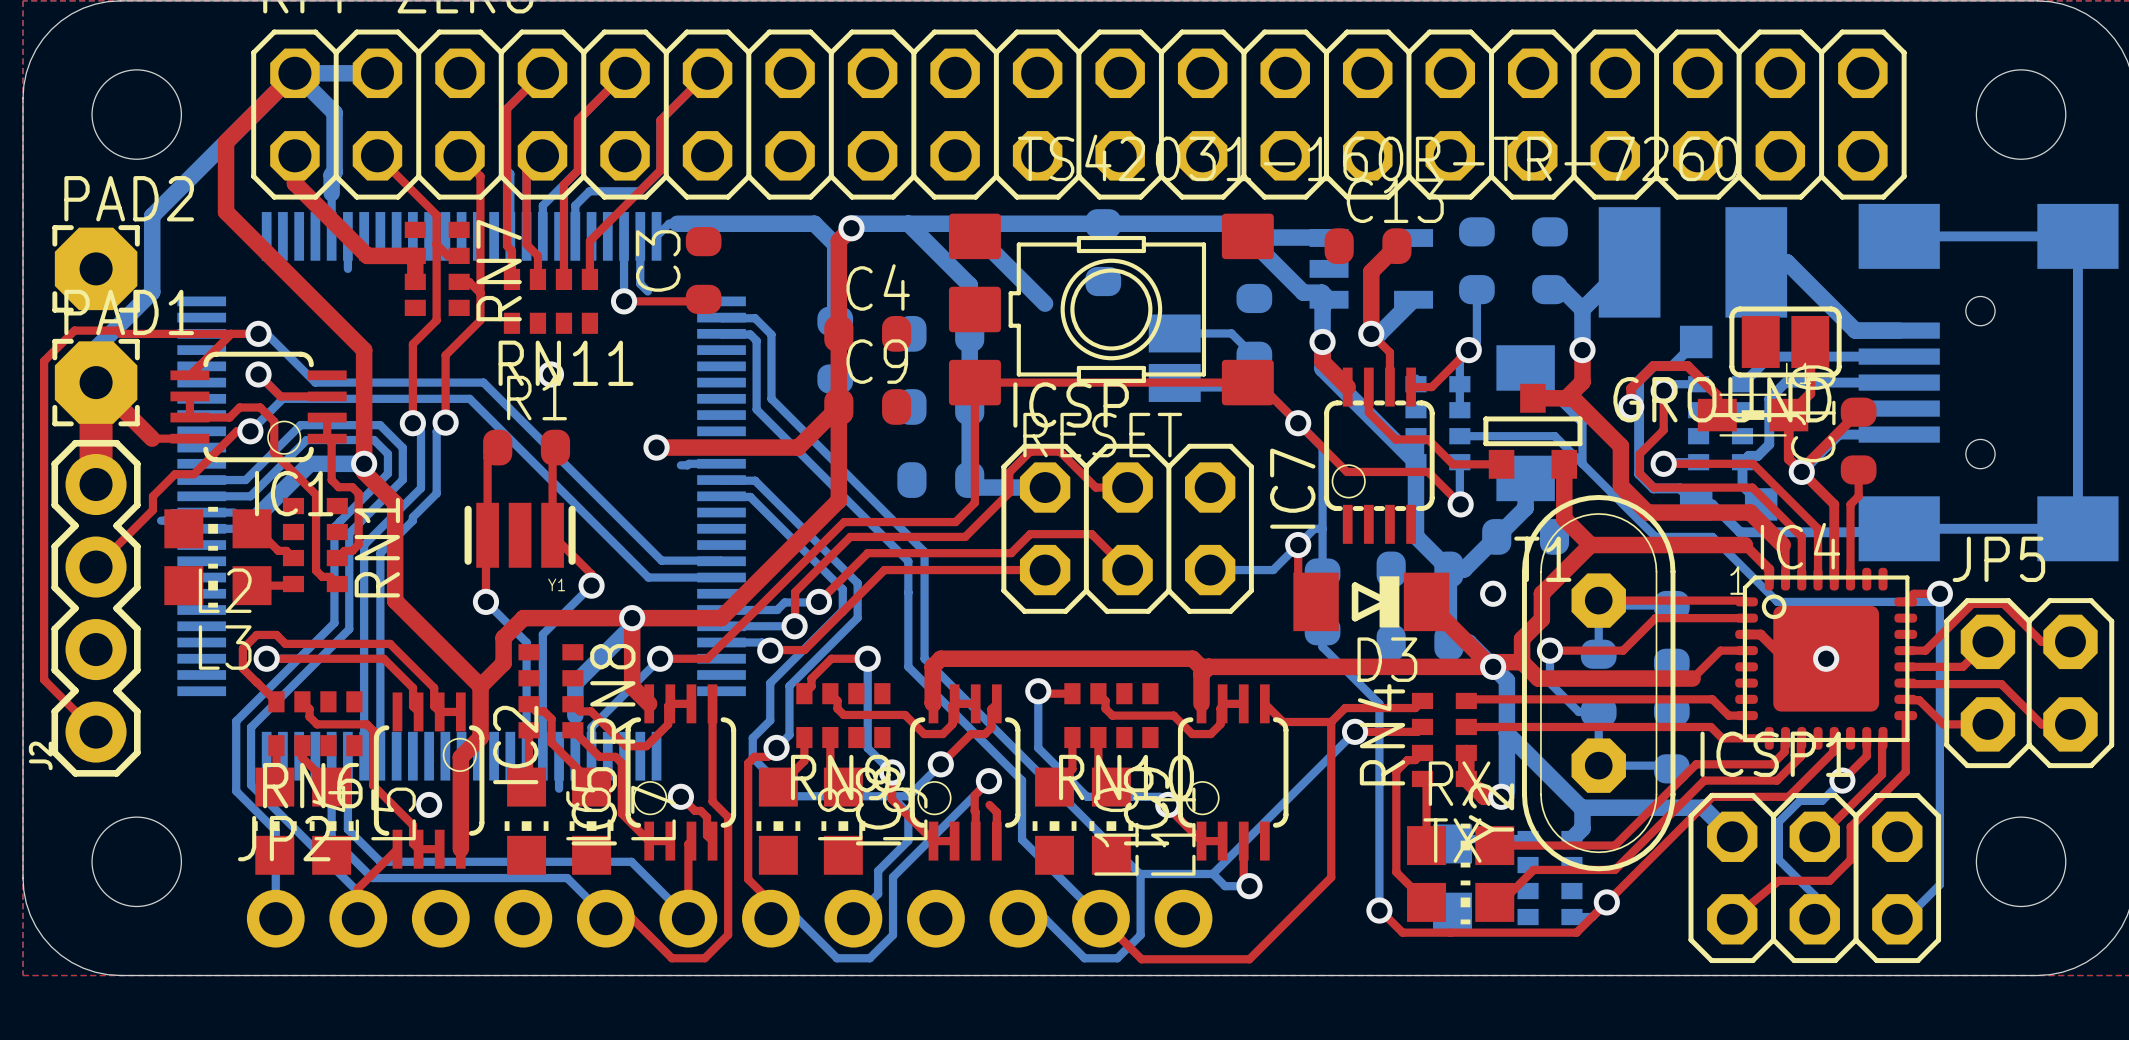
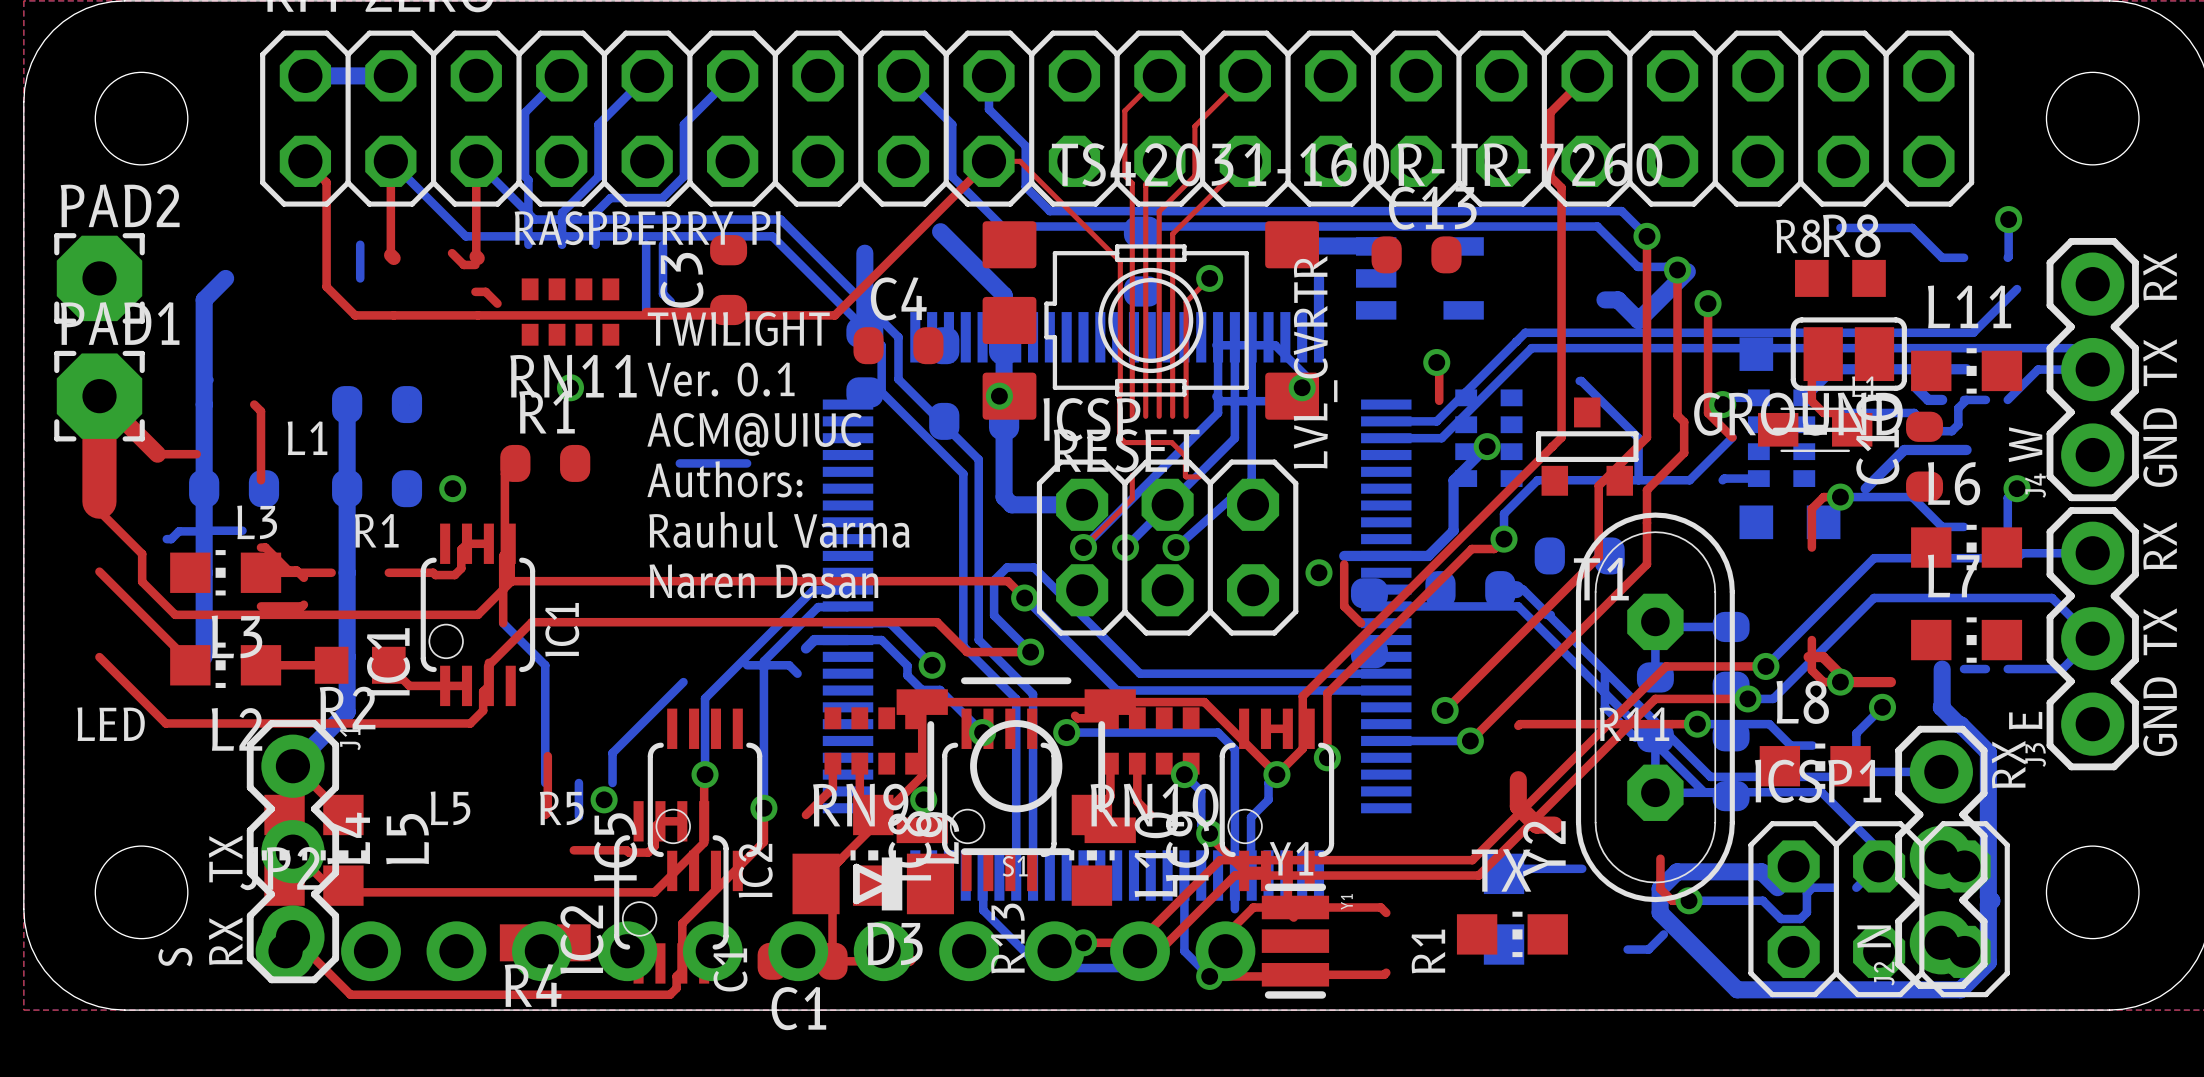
top track: (294, 73) (226, 142) (226, 212) (364, 350) (364, 472) (395, 503) (395, 600) (480, 686) -> none
top track: (542, 73) (507, 108) (507, 245) (511, 250) (511, 279) -> none
top track: (625, 73) (583, 114) -> none
top track: (707, 73) (660, 120) (660, 170) (589, 241) (589, 279) -> none
bottom track: none -> (903, 75) (952, 124) (952, 176) (1002, 226) (1597, 226) (1637, 266) (1666, 266) (1677, 270)
bottom track: none -> (988, 75) (988, 109) (1025, 146) (1025, 186) (1049, 211) (1621, 211) (1646, 236)
top track: none -> (1159, 75) (1124, 110) (1124, 175) (1132, 183) (1132, 416)
top track: none -> (1245, 75) (1194, 126) (1194, 175) (1159, 211) (1159, 416)
top track: none -> (1587, 75) (1550, 112) (1550, 176) (1561, 187) (1561, 437) (1302, 696) (1302, 748) (1276, 774) (1204, 702) (922, 702) (922, 776) (816, 883) (832, 900) (832, 961) (910, 961) (911, 959)
top track: (583, 114) (577, 120) (577, 170) (563, 184) (563, 279) -> none
top track: (294, 155) (294, 183) (367, 255) (415, 255) (415, 281) -> (305, 161) (326, 182) (326, 286) (355, 315) (834, 315) (988, 161) (1020, 161) (1120, 261) (1119, 437) (1125, 442) (1171, 442) (1185, 456) (1185, 476) (1199, 476)
top track: (377, 155) (436, 214) (436, 320) (412, 344) (412, 423) -> (390, 161) (390, 255) (393, 258)
bottom track: none -> (390, 161) (465, 236) (772, 236) (881, 345) (881, 392) (963, 473) (963, 646) (1016, 699) (1016, 875)
top track: (459, 155) (480, 176) (480, 320) (445, 355) (445, 422) -> (476, 161) (476, 256) (477, 258)
bottom track: none -> (476, 161) (534, 219) (780, 219) (898, 337) (898, 379) (978, 459) (978, 639) (1033, 694) (1033, 875)
top track: (542, 155) (526, 171) (526, 244) (537, 255) (537, 279) -> none
top track: none -> (1245, 161) (1172, 234) (1172, 416)
top track: none -> (1145, 183) (1145, 416)
bottom track: none -> (2008, 219) (2007, 257)
via: none -> (2008, 219)
text: none -> RASPBERRY PI (647, 228)
bottom track: none -> (1840, 227) (1912, 227) (1942, 257) (1964, 257)
bottom track: (965, 223) (1045, 303) -> none
top track: (851, 228) (838, 240) (838, 500) (721, 618) (523, 618) (503, 637) (503, 663) (480, 686) -> none
via: (851, 228) -> none
top track: none -> (1646, 236) (1646, 437) (1598, 485) (1598, 556) (1445, 710)
via: none -> (1646, 236)
text: none -> R8 (1798, 236)
bottom track: (331, 236) (334, 112) (294, 73) (152, 216) (152, 292) (96, 348) (96, 382) -> none
bottom track: (656, 236) (669, 223) (814, 223) (835, 244) (855, 223) (1234, 223) (1303, 292) (1321, 292) (1329, 299) (1322, 306) (1322, 368) (1415, 462) -> none
bottom track: (1899, 236) (2077, 236) (2077, 528) (1899, 528) (1854, 532) (1740, 532) (1712, 504) (1696, 504) (1680, 488) (1653, 488) (1639, 474) (1639, 414) (1631, 406) (1639, 399) (1639, 380) (1653, 366) (1672, 366) (1696, 341) -> none
top track: (1396, 246) (1371, 271) (1371, 333) (1387, 350) -> none
part: (1476, 260) -> none
part: (1549, 260) -> none
top track: none -> (1677, 270) (1677, 415) (1684, 422) (1684, 452) (1646, 490) (1646, 564)
via: none -> (1677, 270)
text: none -> RX (2160, 276)
part: (1692, 262) -> none
bottom track: (1756, 262) (1787, 262) (1855, 330) (1899, 330) -> none
bottom track: none -> (225, 278) (204, 299) (204, 656)
RN7: (437, 268) -> none
top track: none -> (1209, 278) (1186, 301) (1186, 416)
via: none -> (1209, 278)
bottom track: none -> (1318, 278) (1318, 337) (1318, 303)
R8: none -> (1840, 278)
bottom track: none -> (2017, 289) (1973, 332) (1525, 332) (1436, 421) (1386, 421)
bottom track: (1476, 289) (1476, 341) (1459, 359) (1459, 410) -> none
top track: none -> (1708, 303) (1708, 413) (1732, 437)
via: none -> (1708, 303)
bottom track: (1413, 299) (1379, 333) (1371, 333) -> none
via: (624, 301) -> none
bottom track: (1582, 309) (1582, 350) -> none
bottom track: (721, 317) (755, 318) (771, 334) (771, 398) (924, 551) (924, 658) (1140, 874) (1140, 935) (1117, 958) (1084, 958) (1044, 918) (1018, 918) -> none
text: none -> TWILIGHT (738, 329)
bottom track: none -> (1218, 337) (1218, 412) (1083, 547)
bottom track: none -> (1234, 337) (1234, 438) (1125, 547)
bottom track: none -> (1251, 337) (1251, 480) (1176, 547)
C1 side: bottom (1254, 327) -> top (802, 961)
top track: (231, 333) (189, 375) -> none
top track: (258, 333) (120, 333) (117, 330) (74, 330) (44, 361) (44, 679) (96, 732) -> none
bottom track: (258, 333) (266, 333) (315, 382) (483, 382) (661, 560) (721, 561) -> none
via: (258, 333) -> none
bottom track: (721, 333) (750, 334) (756, 340) (756, 409) (908, 561) (908, 666) -> (805, 648) (814, 640) (881, 640) (907, 665) (907, 675) (921, 689) (940, 690)
via position: (1371, 333) -> (1436, 362)
text: none -> LVL_CVRTR (1315, 362)
top track: (1322, 341) (1322, 361) (1347, 387) -> none
via: (1322, 341) -> none
top track: (1810, 341) (1810, 393) (1788, 415) (1788, 458) (1834, 504) (1834, 579) -> none
text: none -> TX (2160, 362)
top track: (1468, 350) (1431, 387) (1411, 387) -> none
via: (1468, 350) -> none
top track: (1582, 350) (1582, 382) (1566, 398) -> none
via: (1582, 350) -> none
J4: none -> (2092, 369)
part: (1174, 358) -> none
top track: none -> (1811, 370) (1811, 401) (1823, 412) (1840, 412)
text: none -> Ver. 0.1 (721, 379)
top track: (258, 374) (280, 396) (327, 396) -> none
via: (258, 374) -> none
via: none -> (1302, 387)
bottom track: none -> (1916, 387) (1928, 399) (1942, 399)
via: none -> (999, 396)
bottom track: (1899, 382) (1785, 382) (1769, 398) (1769, 444) (1757, 455) (1748, 455) (1742, 462) (1742, 485) (1761, 504) -> none
part: (1988, 382) -> none
bottom track: none -> (1964, 399) (1985, 399)
bottom track: none -> (1966, 399) (1958, 408) (1958, 424) (1951, 431) (1932, 431) (1914, 412) (1840, 412)
bottom track: none -> (2007, 399) (2038, 369) (2092, 369) (2071, 348) (1531, 348) (1441, 438) (1386, 438)
bottom track: (1262, 387) (1322, 447) (1322, 573) -> none
top track: (1368, 387) (1368, 412) (1395, 439) (1428, 439) (1453, 464) (1501, 464) -> none
top track: none -> (254, 404) (260, 411) (260, 480)
bottom track: none -> (347, 404) (347, 712) (292, 766)
part: none -> (377, 404)
top track: (1663, 390) (1663, 430) (1639, 453) (1639, 473) (1653, 487) (1752, 487) (1801, 536) (1801, 579) -> none
top track: (189, 396) (189, 417) (229, 417) (239, 407) (260, 407) (274, 421) (274, 452) (316, 494) (316, 570) (322, 576) (330, 576) (337, 584) -> none
bottom track: (282, 398) (469, 398) (648, 577) (721, 577) -> none
bottom track: (282, 398) (250, 431) -> none
top track: (1532, 398) (1573, 398) (1620, 446) (1620, 486) (1647, 512) (1750, 512) (1785, 547) (1785, 579) -> none
IC1 rotation: 0° (258, 406) -> 90° clockwise (477, 614)
IC1 position: (258, 406) -> (477, 614)
top track: (838, 406) (798, 447) (656, 447) -> none
C9: (867, 406) -> none
top track: (1631, 406) (1631, 388) (1653, 366) (1687, 366) (1717, 395) (1717, 415) -> none
via: (1631, 406) -> none
top track: (1858, 412) (1801, 469) (1801, 471) -> none
top track: (327, 417) (327, 438) (331, 443) (331, 480) (338, 487) (352, 487) (358, 493) (358, 544) (352, 550) (344, 550) (337, 558) -> none
text: none -> ACM@UIUC (754, 434)
bottom track: (445, 422) (436, 431) (436, 493) (380, 553) (380, 756) -> none
via: (445, 422) -> none
bottom track: none -> (1732, 437) (1689, 480) (1537, 480) (1504, 513) (1504, 539)
text: none -> L1 (307, 438)
bottom track: (412, 423) (421, 431) (421, 488) (364, 545) (364, 756) -> none
via: (412, 423) -> none
via: (1298, 423) -> none
part: (1525, 423) -> none
text: none -> GND (2160, 447)
text: none -> W (2025, 444)
top track: (250, 431) (236, 431) (193, 474) (175, 474) (152, 496) (152, 510) (96, 567) -> none
via: (250, 431) -> none
bottom track: none -> (1487, 446) (1453, 480) (1453, 530) (1428, 555) (1344, 555)
via: none -> (1487, 446)
bottom track: (1415, 436) (1415, 536) (1448, 569) (1448, 642) (1468, 642) (1506, 680) (1506, 791) (1501, 796) -> none
bottom track: (1459, 436) (1554, 436) (1655, 536) (1712, 536) (1777, 601) (1931, 601) (1939, 593) (1939, 884) (1905, 919) (1897, 919) -> none
J2 footprint: [51, 439, 141, 777] -> [1895, 725, 1988, 989]
top track: (555, 447) (552, 450) (552, 535) (591, 574) (591, 585) -> none
via: (656, 447) -> none
IC7: (1379, 455) -> none
top track: none -> (1132, 475) (1132, 498) (1083, 547)
bottom track: (1459, 462) (1460, 504) -> none
bottom track: (364, 463) (309, 463) (244, 528) (201, 528) -> none
via: (364, 463) -> none
text: none -> Authors: (724, 479)
bottom track: (721, 463) (680, 465) -> none
top track: (1663, 463) (1753, 463) (1818, 528) (1818, 579) -> none
via: (1663, 463) -> none
top track: (1564, 464) (1564, 518) (1590, 545) (1744, 545) (1769, 569) (1769, 579) -> none
top track: none -> (99, 486) (99, 511) (142, 553) (142, 581) (175, 614) (477, 614) (510, 582) (510, 543)
top track: (1858, 469) (1858, 496) (1850, 504) (1850, 579) -> none
part: none -> (234, 488)
part: none -> (377, 488)
via: none -> (452, 488)
via position: (1801, 471) -> (1840, 497)
bottom track: none -> (2017, 488) (2007, 497) (2007, 526)
via: none -> (2017, 488)
bottom track: (1525, 478) (1525, 508) (1464, 569) -> (1941, 771) (1870, 771) (1866, 776) (1710, 776) (1523, 589) (1516, 589)
bottom track: (201, 480) (245, 480) (300, 425) (380, 425) (402, 447) (402, 479) (349, 533) (349, 629) (251, 727) (251, 785) (358, 892) (358, 918) -> none
bottom track: (721, 480) (755, 480) (857, 583) (857, 617) (789, 686) (789, 735) (776, 747) -> none
part: (940, 480) -> none
top track: none -> (1840, 497) (1823, 497) (1811, 508) (1811, 547)
bottom track: none -> (1840, 497) (1912, 497) (1942, 526) (1964, 526)
top track: (1127, 487) (1095, 487) (1059, 451) (1030, 451) (1009, 472) (1009, 492) (965, 536) (850, 536) (795, 592) (794, 626) -> none
bottom track: (201, 496) (250, 496) (306, 440) (374, 440) (387, 453) (387, 473) (334, 527) (334, 623) (236, 721) (236, 791) (275, 830) (275, 918) -> none
part position: (461, 496) -> (1117, 606)
bottom track: (721, 496) (750, 496) (842, 589) (842, 611) (770, 683) (770, 720) (752, 738) (752, 757) (791, 796) (908, 796) (940, 764) -> none
text: none -> L3 (257, 522)
top track: (1460, 504) (1428, 471) (1346, 471) (1257, 382) (974, 382) (974, 502) (955, 522) (844, 522) (707, 658) (660, 658) -> none
via position: (1460, 504) -> (1504, 539)
text: none -> R1 (376, 530)
text: none -> Rauhul Varma (779, 529)
top track: none -> (1504, 539) (1494, 548) (1471, 548) (1327, 693) (1327, 757)
text: none -> RX (2160, 545)
top track: none -> (488, 543) (467, 543) (461, 549) (461, 568) (454, 575) (435, 575) (433, 572) (388, 572)
L2 position: (217, 528) -> (225, 665)
via: none -> (1083, 547)
via: none -> (1125, 547)
via: none -> (1176, 547)
bottom track: (1322, 528) (1314, 528) (1273, 570) (1210, 570) -> none
bottom track: none -> (2092, 553) (2022, 553) (2017, 558) (1874, 558) (1765, 666)
Y1 rotation: 0° (520, 535) -> 90° clockwise (1295, 941)
Y1 position: (520, 535) -> (1295, 941)
RN1: (315, 545) -> none
via position: (1298, 545) -> (1318, 572)
top track width: thick (1590, 545) (1541, 593) -> thin (1646, 564) (1596, 614)
top track: none -> (99, 571) (190, 662) (190, 665)
top track: none -> (260, 572) (331, 572)
top track: none -> (510, 581) (1007, 581) (1024, 598)
text: none -> Naren Dasan (763, 581)
bottom track: none -> (848, 589) (813, 590) (705, 698) (705, 774)
top track: (1045, 570) (884, 570) (804, 650) (770, 650) -> none
top track: (1127, 570) (1091, 534) (1030, 534) (1011, 553) (867, 553) (818, 601) -> none
bottom track: none -> (1024, 598) (1117, 690) (1386, 690)
via: none -> (1024, 598)
Y1 name position: Y1 (556, 584) -> Y1 (1346, 901)
L3 position: (217, 585) -> (225, 572)
bottom track: (591, 585) (542, 634) (542, 756) -> none
via: (591, 585) -> none
bottom track: none -> (848, 606) (818, 607) (763, 661) (763, 808)
bottom track: none -> (1386, 606) (1518, 606) (1704, 792) (1821, 792) (1886, 857) (1856, 887)
via: (1493, 593) -> none
top track: (1541, 593) (1541, 619) (1522, 639) (1522, 662) -> (1596, 614) (1470, 740)
top track: (1939, 593) (1913, 593) (1905, 601) -> none
via: (1939, 593) -> none
top track: (1598, 600) (1746, 601) -> none
via: (485, 601) -> none
bottom track: (818, 601) (784, 602) (777, 610) (721, 610) -> (848, 623) (890, 623) (932, 665)
via: (818, 601) -> none
D3 position: (1371, 601) -> (873, 883)
top track: (1426, 601) (1491, 666) -> none
text: none -> TX (2160, 631)
text: none -> IC1 (562, 629)
J3: none -> (2092, 638)
top track: (632, 618) (632, 686) (649, 703) -> none
bottom track: (632, 618) (632, 626) (575, 683) (575, 756) -> none
via: (632, 618) -> none
top track: (1746, 618) (1655, 618) (1623, 650) (1549, 650) -> none
top track: none -> (1811, 640) (1811, 670) (1823, 682) (1840, 682)
bottom track: (721, 626) (794, 626) -> none
via: (794, 626) -> none
top track: none -> (1030, 652) (967, 652) (937, 622) (531, 622) (488, 665)
bottom track: none -> (1030, 652) (994, 615) (994, 580) (1007, 567) (1033, 567) (1140, 673) (1386, 673)
via: none -> (1030, 652)
bottom track: (1322, 630) (1322, 647) (1379, 703) (1379, 910) -> none
top track: none -> (99, 657) (165, 723) (470, 723) (483, 710) (483, 691) (488, 685) (488, 662)
top track: (1987, 641) (1962, 666) (1905, 666) -> none
top track: (2070, 641) (2041, 641) (2003, 603) (1972, 603) (1925, 650) (1905, 650) -> none
top track: none -> (260, 665) (331, 665)
R2: none -> (360, 665)
top track: none -> (388, 665) (409, 685) (467, 685)
part: (1420, 642) -> none
top track: none -> (1765, 666) (1666, 666) (1472, 860) (1220, 860) (1137, 942) (1083, 942)
via: none -> (1765, 666)
bottom track: none -> (1942, 669) (1941, 707) (1988, 752) (1988, 897) (1991, 900) (1988, 904) (1988, 962) (1960, 989) (1737, 989) (1660, 912) (1660, 888) (1677, 871) (1761, 871) (1777, 887) (1790, 887)
bottom track: none -> (1964, 669) (1985, 669)
bottom track: none -> (2007, 669) (2062, 669) (2092, 638) (2052, 598) (1874, 598) (1773, 698) (1747, 698)
via: (770, 650) -> none
via: (1549, 650) -> none
top track: (1746, 650) (1720, 650) (1692, 678) (1538, 678) (1522, 662) -> none
top track: (266, 658) (383, 658) (413, 687) (413, 706) (418, 711) -> none
via: (266, 658) -> none
via: (660, 658) -> none
top track: (867, 658) (831, 658) (811, 678) (811, 686) (804, 693) -> none
bottom track: (867, 658) (867, 748) (892, 772) -> none
via position: (867, 658) -> (932, 665)
via: none -> (1840, 682)
IC4: (1826, 658) -> none
via position: (1826, 658) -> (1882, 707)
top track: (1522, 662) (1497, 662) (1493, 666) (1200, 666) (1192, 658) (940, 658) (932, 666) (933, 703) -> none
top track: (1208, 666) (1201, 674) (1201, 703) -> none
via: (1493, 666) -> none
top track: none -> (1747, 698) (1655, 698) (1478, 875) (1234, 875) (1142, 968)
via: none -> (1747, 698)
top track: (256, 682) (242, 668) (242, 648) (256, 634) (276, 634) (285, 643) (390, 643) (434, 687) (434, 706) (439, 711) (460, 711) -> none
top track: (257, 682) (276, 701) -> none
bottom track: none -> (1882, 707) (1856, 733) (1856, 745)
top track: (1905, 683) (2001, 684) (2041, 724) (2070, 724) -> none
JP5: (2029, 683) -> none
text: none -> GND (2160, 716)
top track: (480, 686) (480, 737) (460, 757) (460, 849) -> none
via: none -> (1445, 710)
text: none -> E (2025, 720)
RN8: (550, 691) -> none
bottom track: (1038, 691) (1038, 748) (1087, 796) (1160, 796) -> (1184, 774) (1201, 791) (1201, 825)
via position: (1038, 691) -> (1066, 732)
top track: (830, 693) (837, 700) (837, 708) (843, 714) (905, 714) (924, 734) (942, 734) (952, 724) (952, 705) (954, 703) (975, 703) -> none
top track: (1098, 693) (1105, 700) (1105, 708) (1112, 715) (1173, 715) (1192, 734) (1210, 734) (1220, 724) (1220, 708) (1225, 703) -> none
text: none -> LED (111, 724)
text: none -> R11 (1634, 724)
top track: (1639, 699) (1712, 699) (1728, 715) (1746, 715) -> none
bottom track: none -> (1697, 724) (1769, 724) (1790, 745) (1812, 745)
via: none -> (1697, 724)
top track: (1905, 699) (1919, 700) (1943, 724) (1987, 724) -> none
top track: (1422, 700) (1415, 708) (1345, 708) (1331, 721) -> none
top track: (302, 701) (309, 708) (309, 716) (317, 724) (366, 724) (373, 730) (373, 785) (413, 825) (413, 843) (418, 849) (439, 849) -> none
top track: (691, 703) (670, 703) (668, 705) (668, 724) (646, 746) (625, 746) (591, 711) (580, 711) (572, 704) -> none
top track: (712, 703) (712, 801) (728, 817) (728, 934) (704, 958) (671, 958) (632, 918) (605, 918) -> none
top track: (996, 703) (991, 709) (991, 727) (985, 734) (971, 734) (940, 764) -> none
top track: (1264, 703) (1283, 721) (1331, 721) -> none
top track: (529, 704) (536, 711) (544, 711) (551, 718) (551, 742) (591, 782) (591, 787) -> none
bottom track: (948, 707) (1022, 780) (1022, 839) (1100, 918) -> none
via: none -> (982, 732)
bottom track: none -> (1066, 732) (1218, 732) (1234, 749) (1234, 909)
bottom track: none -> (1386, 740) (1470, 740)
via: none -> (1470, 740)
top track: (1905, 715) (1905, 771) (1850, 826) (1850, 859) (1829, 880) (1778, 880) (1732, 919) -> none
top track: (1331, 721) (1331, 877) (1249, 959) (1141, 959) (1100, 918) -> none
RN6: (315, 723) -> none
top track: (1422, 726) (1417, 731) (1355, 731) -> none
top track: (1466, 726) (1710, 726) (1722, 738) (1769, 738) -> none
top track: (572, 730) (599, 756) (615, 756) (621, 763) (621, 813) (649, 841) (670, 841) -> none
via: none -> (1327, 757)
bottom track: (1355, 731) (1212, 873) -> none
via: (1355, 731) -> none
text: none -> RX (2008, 764)
bottom track: (1506, 733) (1581, 807) (1703, 807) (1732, 836) -> none
top track: (1785, 738) (1784, 752) (1772, 764) (1696, 764) (1614, 845) (1494, 845) -> none
top track: (1801, 738) (1800, 756) (1777, 780) (1704, 780) (1614, 869) (1533, 869) (1501, 902) (1494, 902) -> none
top track: (1834, 738) (1833, 752) (1788, 796) (1712, 796) (1576, 932) (1402, 932) (1379, 910) -> none
top track: (1866, 738) (1866, 756) (1842, 780) -> none
top track: (1883, 738) (1882, 774) (1814, 841) (1814, 836) -> none
S1: none -> (1016, 766)
RN4: (1444, 739) -> none
top track: (776, 747) (767, 756) (754, 756) (748, 763) (748, 879) (770, 901) (770, 918) -> none
via: (776, 747) -> none
top track: none -> (705, 774) (704, 842) (654, 892) (335, 892) (292, 851)
via: none -> (705, 774)
via: none -> (1184, 774)
bottom track: none -> (1276, 774) (1268, 783) (1268, 799) (1251, 817) (1251, 875)
via: none -> (1276, 774)
top track: (1422, 752) (1415, 760) (1407, 760) (1396, 771) (1396, 872) (1426, 902) -> none
bottom track: (331, 756) (331, 837) (372, 878) (567, 878) (605, 918) -> none
bottom track: (347, 756) (347, 829) (380, 861) (631, 861) (688, 918) -> none
via: (940, 764) -> none
via: none -> (604, 799)
top track: (892, 772) (892, 799) (933, 841) (954, 841) -> none
top track: (1422, 778) (1426, 783) (1426, 845) -> none
IC2 rotation: 0° (429, 780) -> 180° (671, 892)
IC2 position: (429, 780) -> (671, 892)
text: none -> L5 (450, 808)
text: none -> R5 (561, 808)
top track: none -> (763, 808) (763, 841) (682, 923) (682, 970) (676, 976) (676, 988) (670, 994) (350, 994) (292, 937)
via: none -> (763, 808)
bottom track: (1842, 780) (1822, 800) (1799, 800) (1778, 821) (1778, 859) (1814, 895) (1814, 919) -> none
via: (1842, 780) -> none
top track: (988, 781) (974, 795) (975, 841) -> none
bottom track: (988, 781) (893, 877) (893, 935) (869, 958) (837, 958) (797, 918) (770, 918) -> none
via: (988, 781) -> none
top track: none -> (682, 821) (660, 821) (654, 827) (654, 846) (648, 852) (628, 852) (626, 850) (573, 850)
top track: (680, 796) (694, 810) (700, 810) (707, 817) (707, 835) (712, 841) -> none
via: (680, 796) -> none
bottom track: (891, 796) (908, 813) (908, 840) (878, 870) (878, 893) (853, 918) -> none
via: (1501, 796) -> none
via: (429, 804) -> none
top track: (989, 804) (996, 812) (996, 841) -> none
bottom track: (1582, 807) (1582, 828) (1571, 839) -> none
L6 rotation: 0° (526, 821) -> 90° counterclockwise (1966, 547)
L6 position: (526, 821) -> (1966, 547)
L7 rotation: 0° (591, 821) -> 90° counterclockwise (1966, 640)
L7 position: (591, 821) -> (1966, 640)
L8 rotation: 0° (778, 821) -> 90° counterclockwise (1815, 766)
L8 position: (778, 821) -> (1815, 766)
L11 rotation: 0° (1111, 821) -> 90° counterclockwise (1966, 370)
L11 position: (1111, 821) -> (1966, 370)
J1: none -> (292, 851)
text: none -> TX (225, 858)
text: none -> Y1 (1291, 858)
top track: none -> (1660, 858) (1660, 888) (1672, 900) (1689, 900)
text: none -> IC2 (755, 870)
top track: (691, 841) (688, 844) (688, 918) -> none
bottom track: none -> (982, 875) (983, 910) (1041, 968) (1142, 968)
bottom track: none -> (1184, 875) (1184, 951) (1209, 976)
RX: (1460, 845) -> none
top track: (397, 849) (358, 888) (358, 918) -> none
bottom track: none -> (1834, 887) (1812, 887) (1806, 893) (1806, 912) (1800, 919) (1781, 919) (1762, 900) (1689, 900)
bottom track: (1139, 873) (1212, 873) -> none
bottom track: (1212, 873) (1225, 886) (1249, 886) -> none
part: (1549, 878) -> none
top track: none -> (1386, 912) (1380, 907) (1253, 907) (1218, 942)
via: (1249, 886) -> none
text: none -> R13 (1007, 938)
text: none -> N (1874, 936)
text: none -> RX (225, 941)
via position: (1606, 902) -> (1689, 900)
R4: none -> (545, 942)
via: none -> (1083, 942)
via: (1379, 910) -> none
text: none -> R1 (1428, 951)
text: none -> S (175, 957)
text: none -> C1 (730, 969)
top track: none -> (1386, 972) (1384, 974) (1209, 976)
via: none -> (1209, 976)

